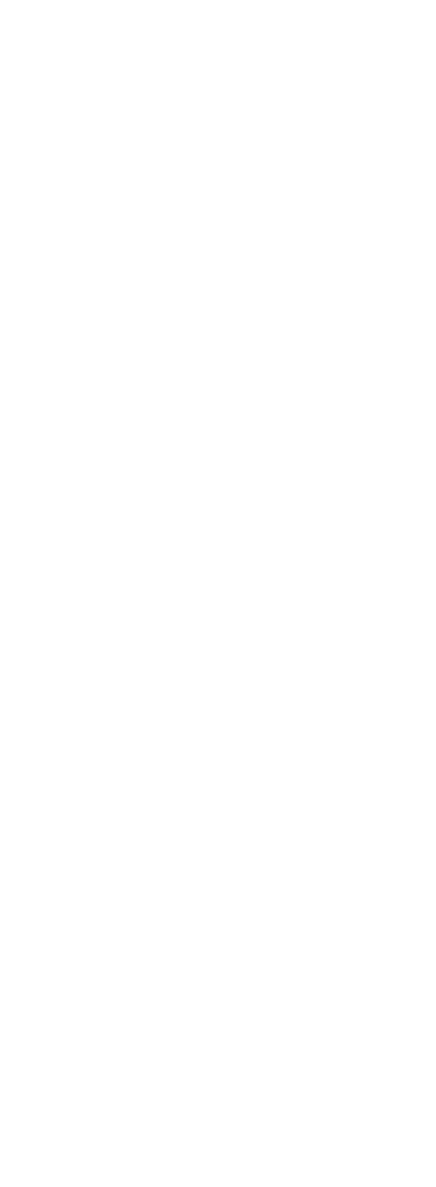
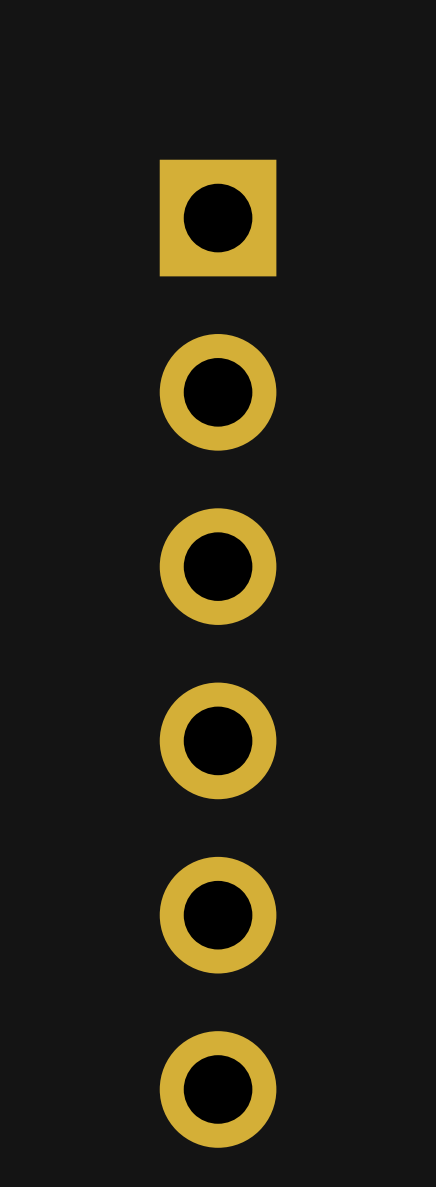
part: none -> (218, 653)

